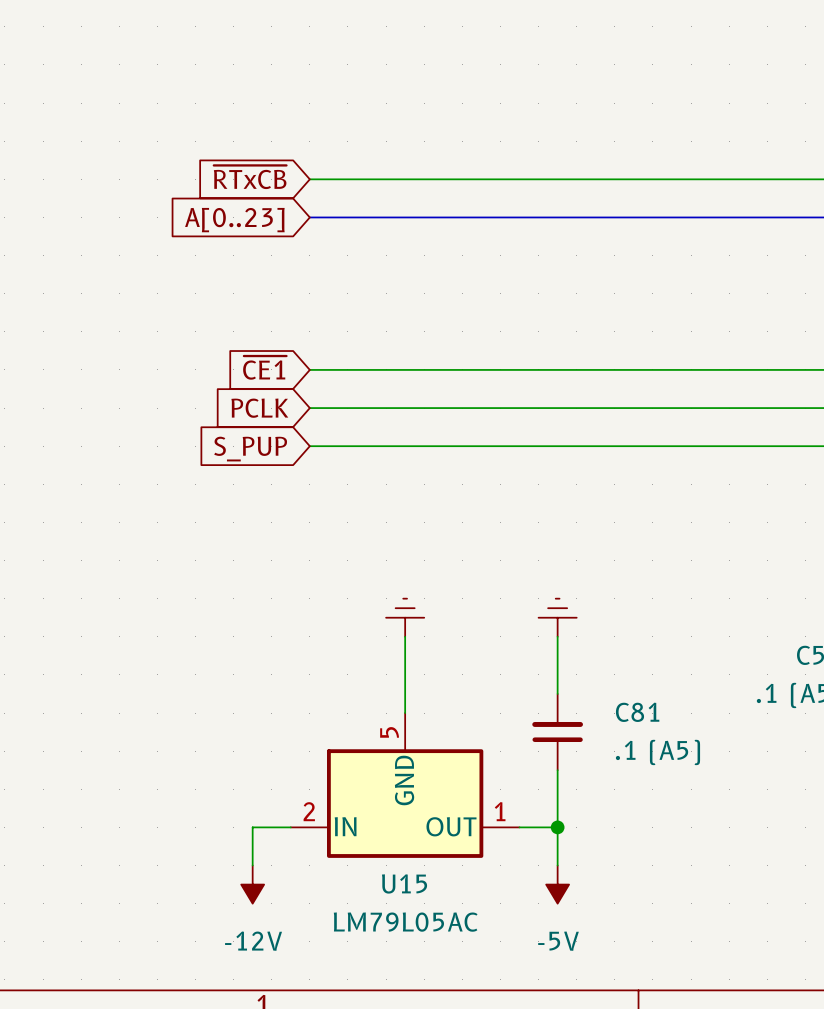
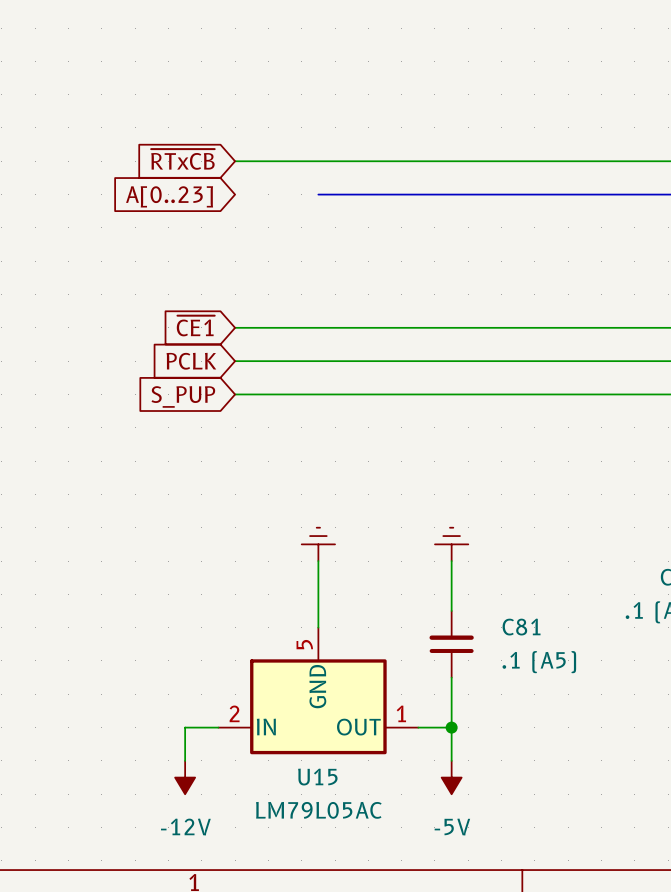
bus: (309, 217) (405, 217) -> none

